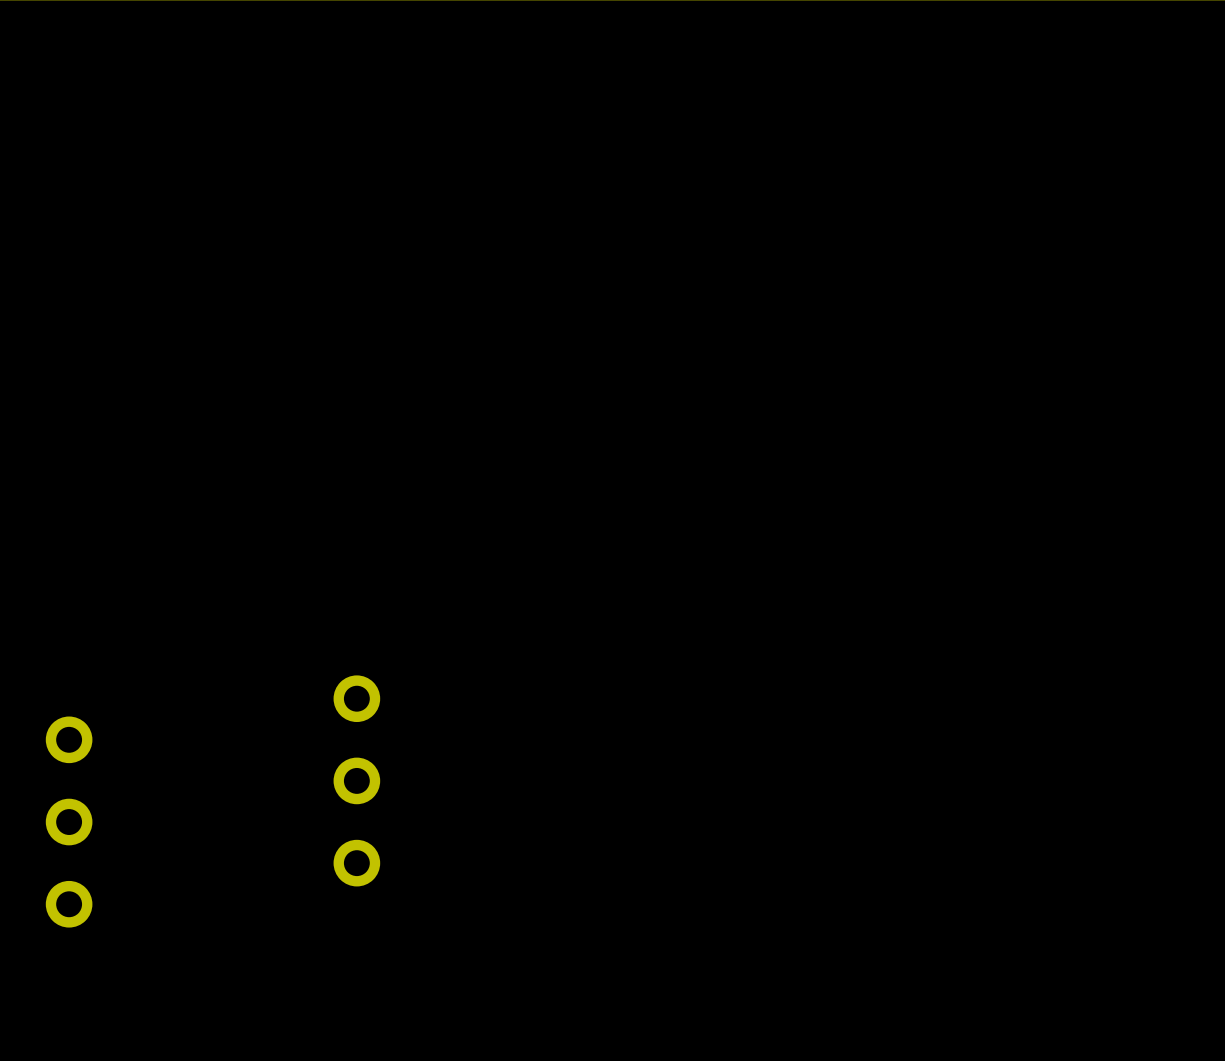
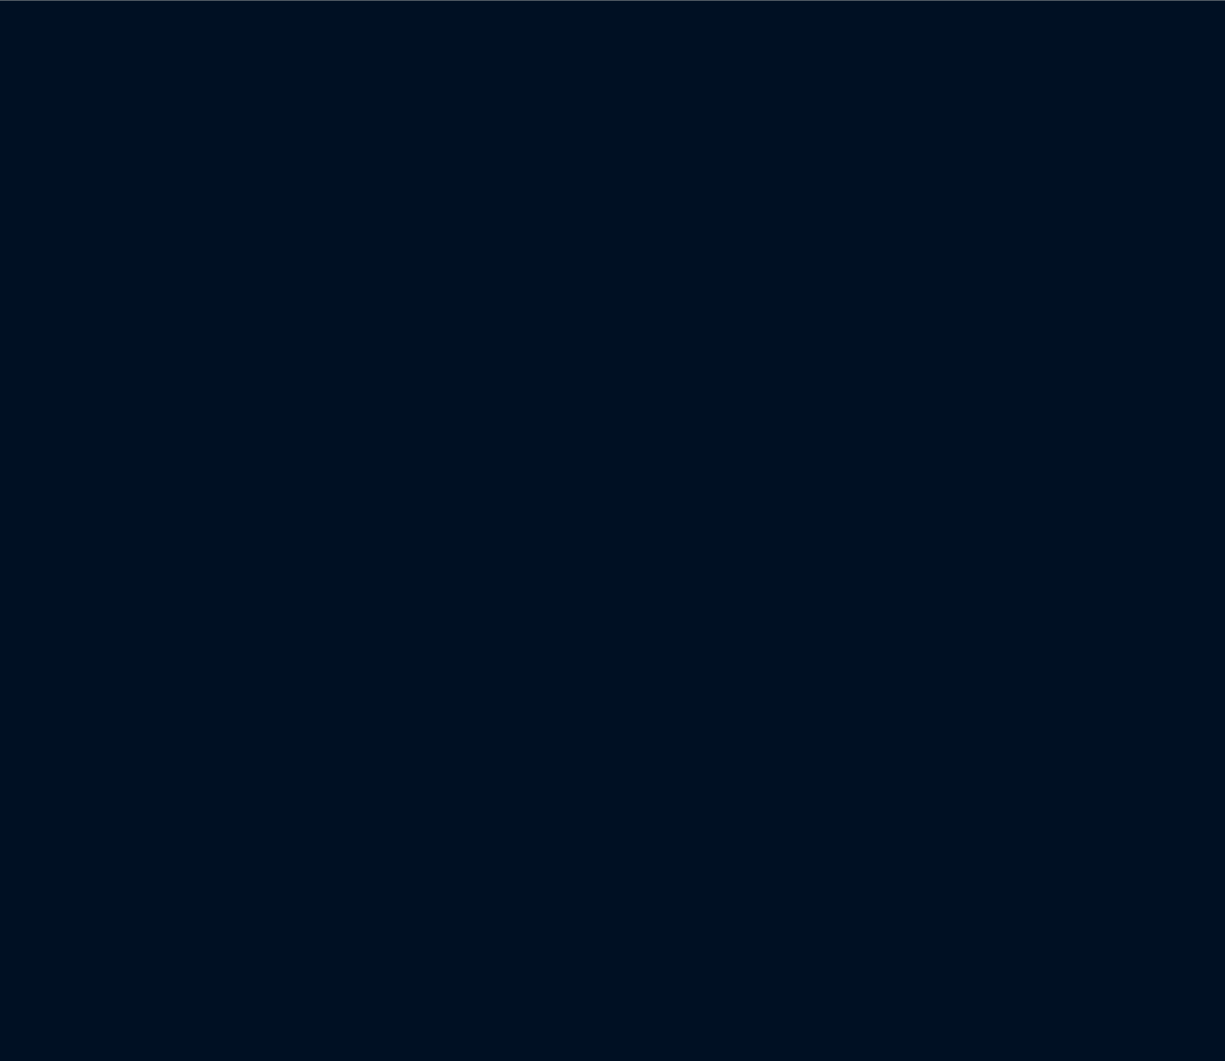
part: (356, 780) -> none
part: (69, 822) -> none

